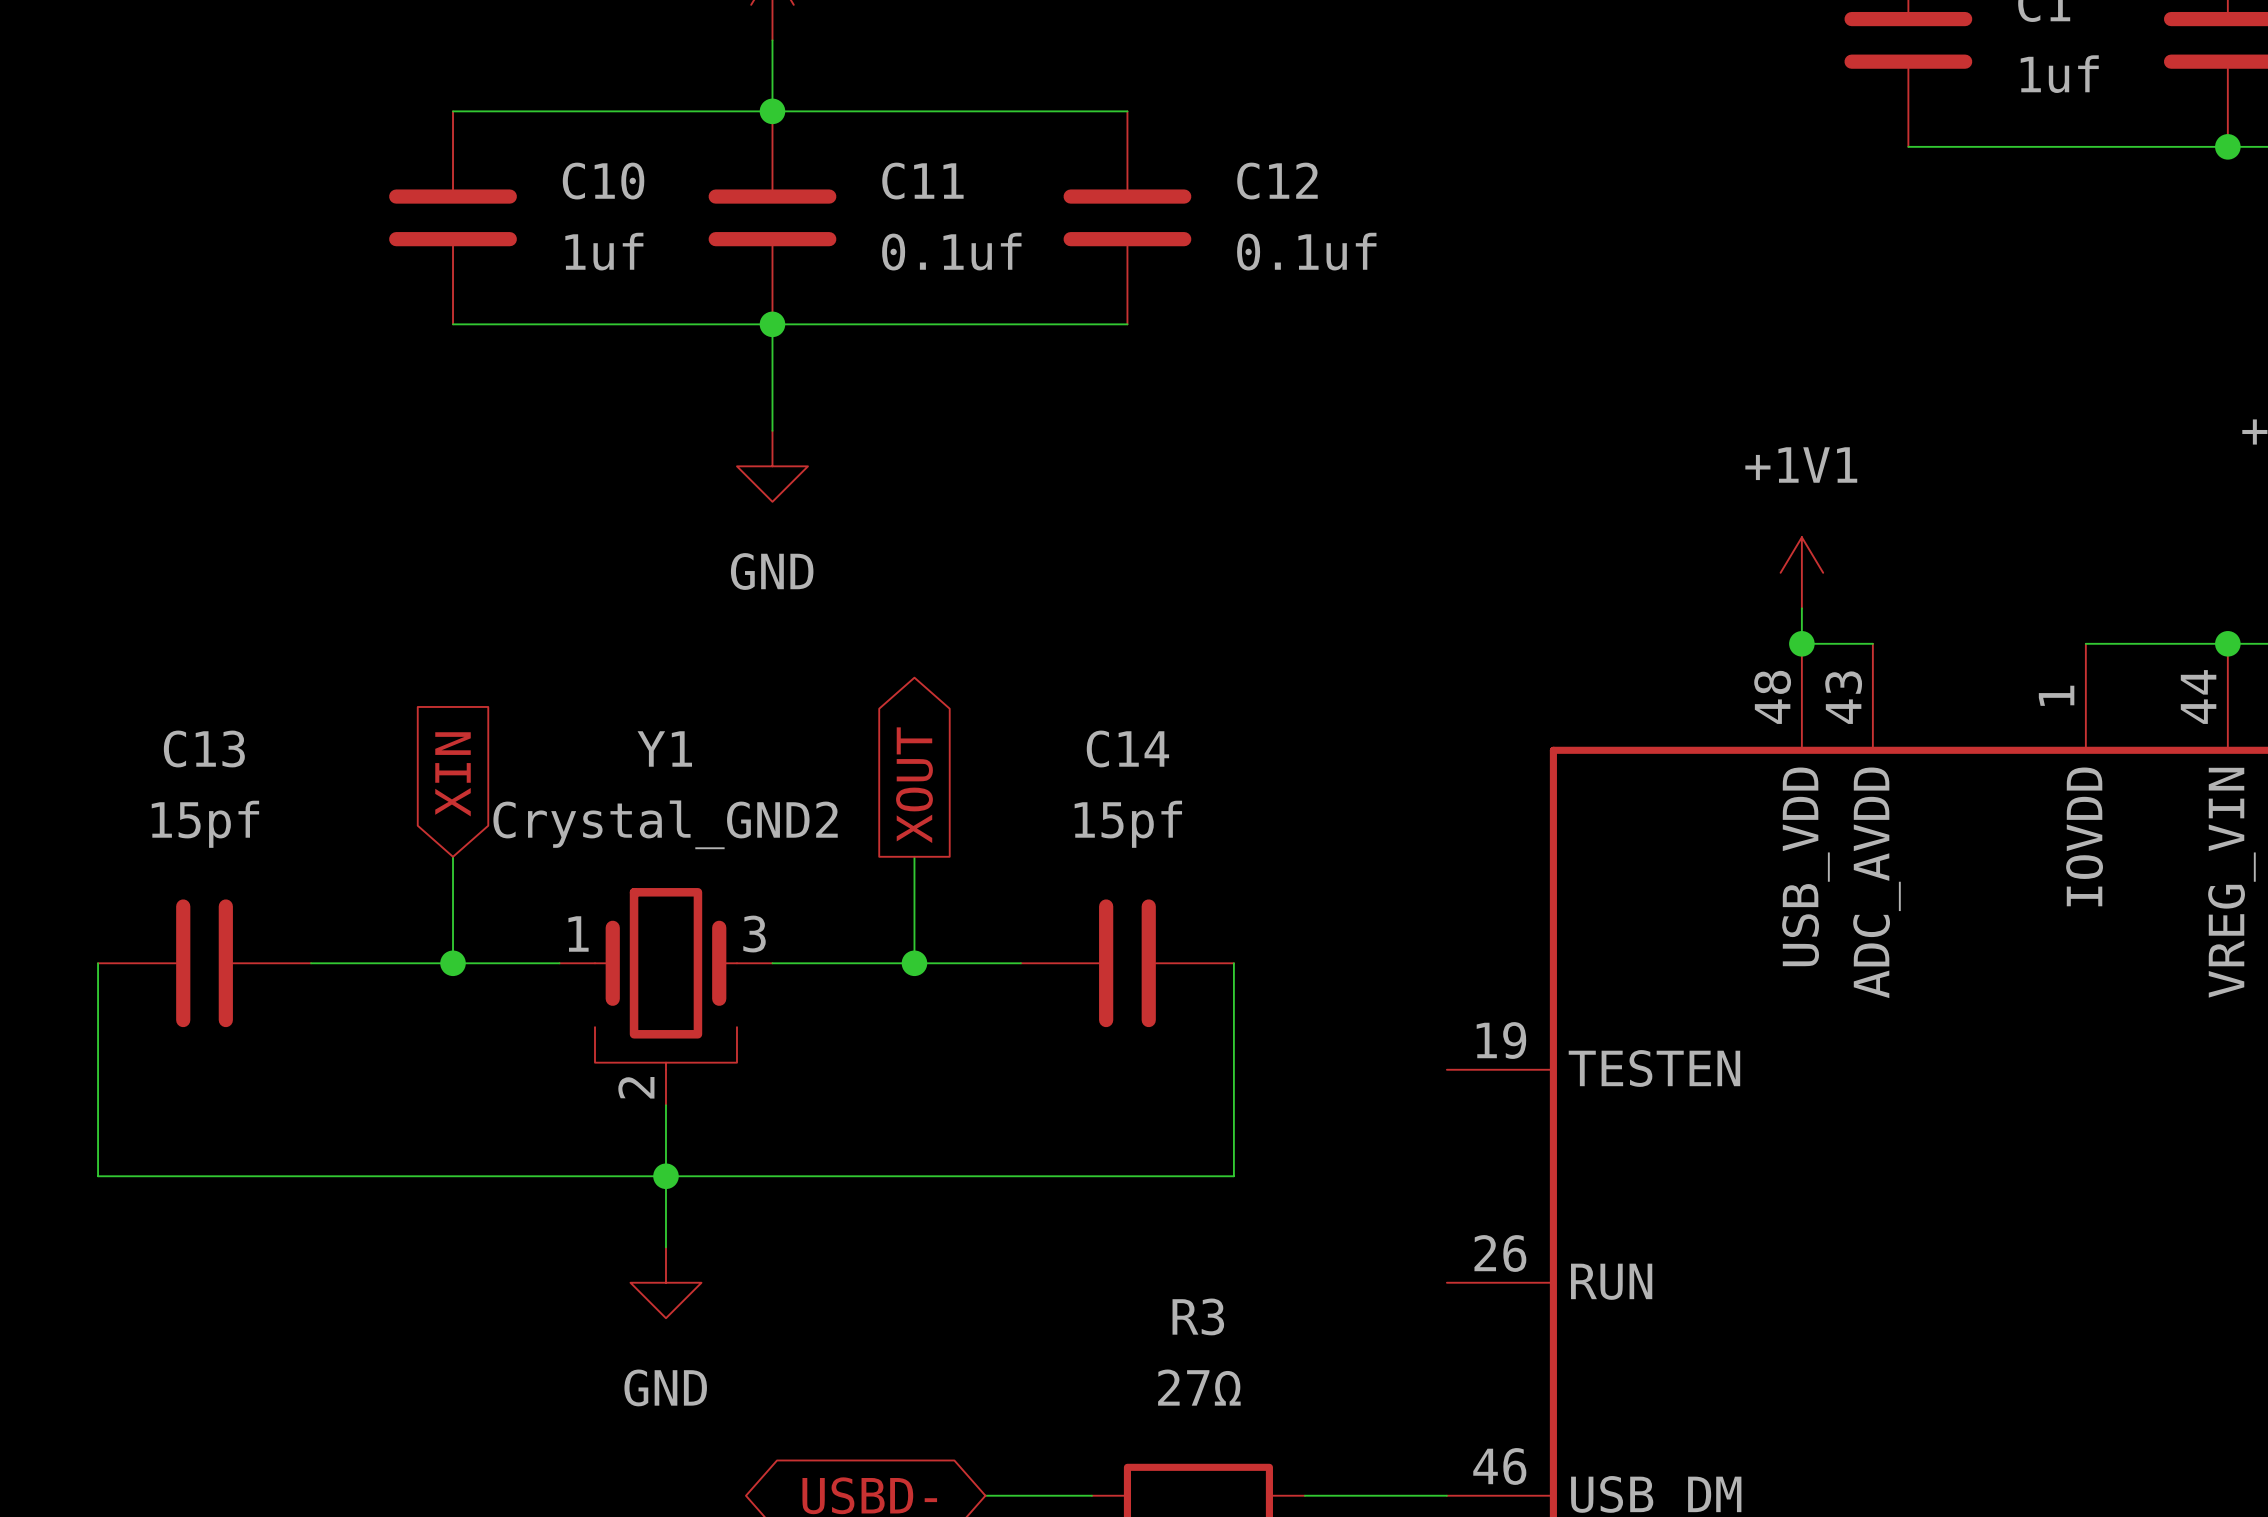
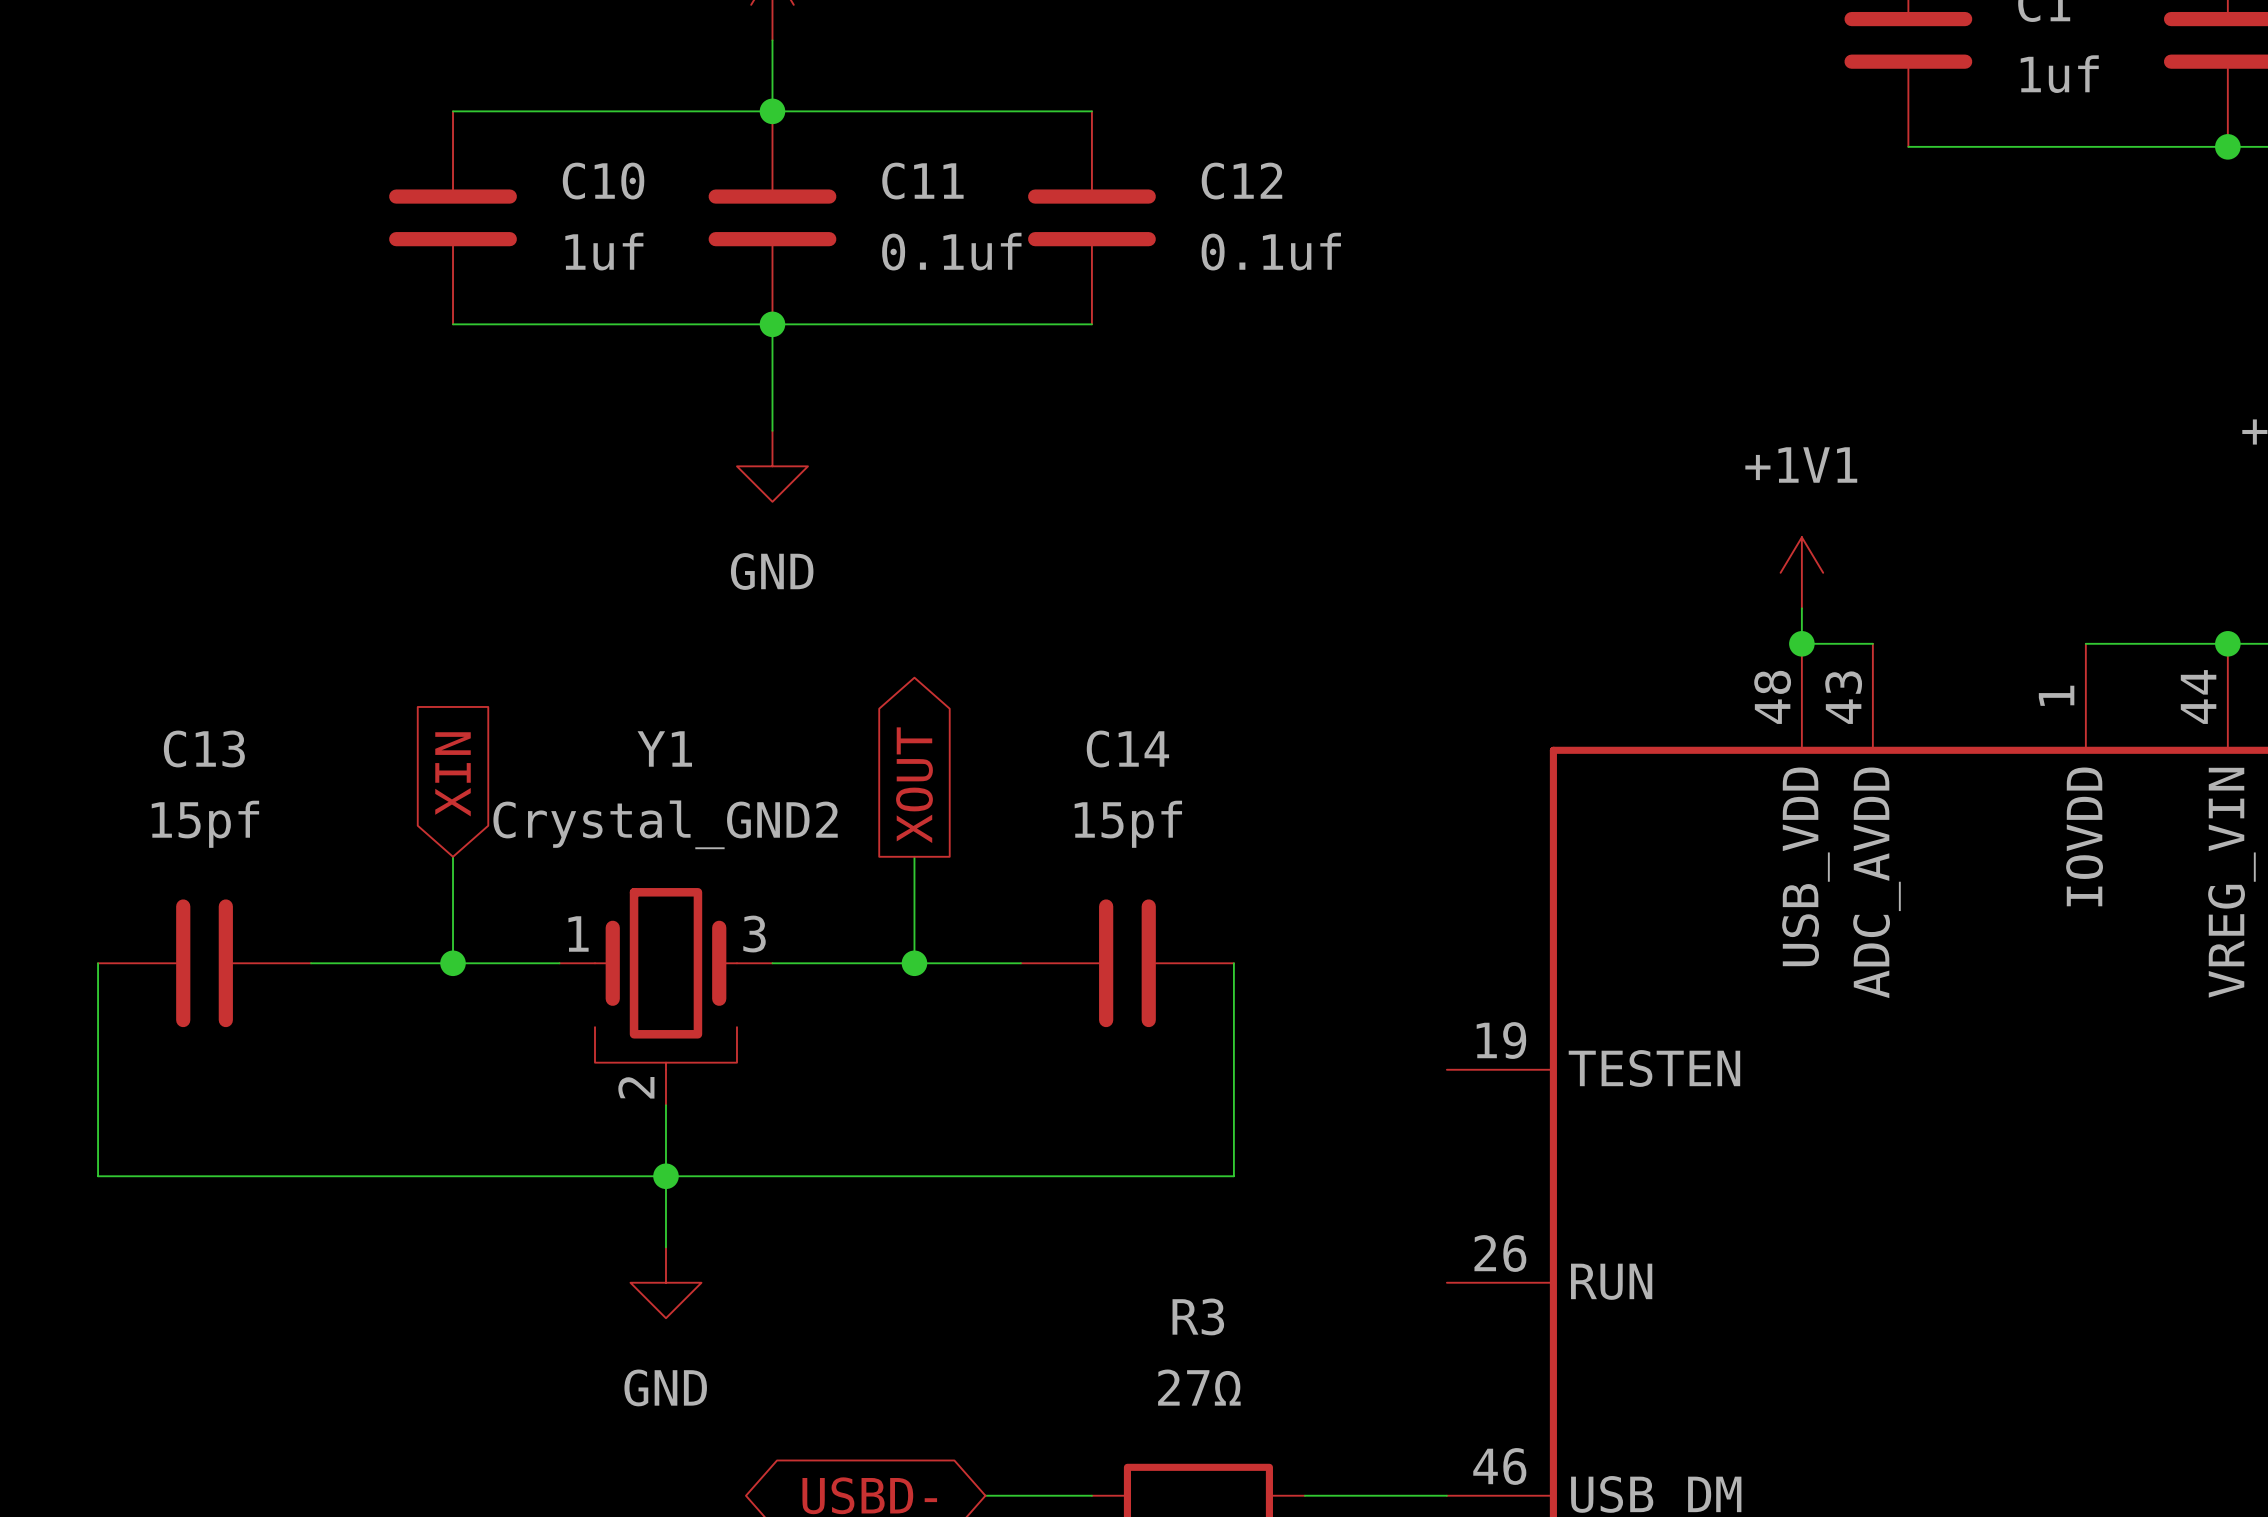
wire: (1091, 111) (1127, 111) -> none
C12 position: (1127, 217) -> (1091, 217)
wire: (1091, 324) (1127, 324) -> none

